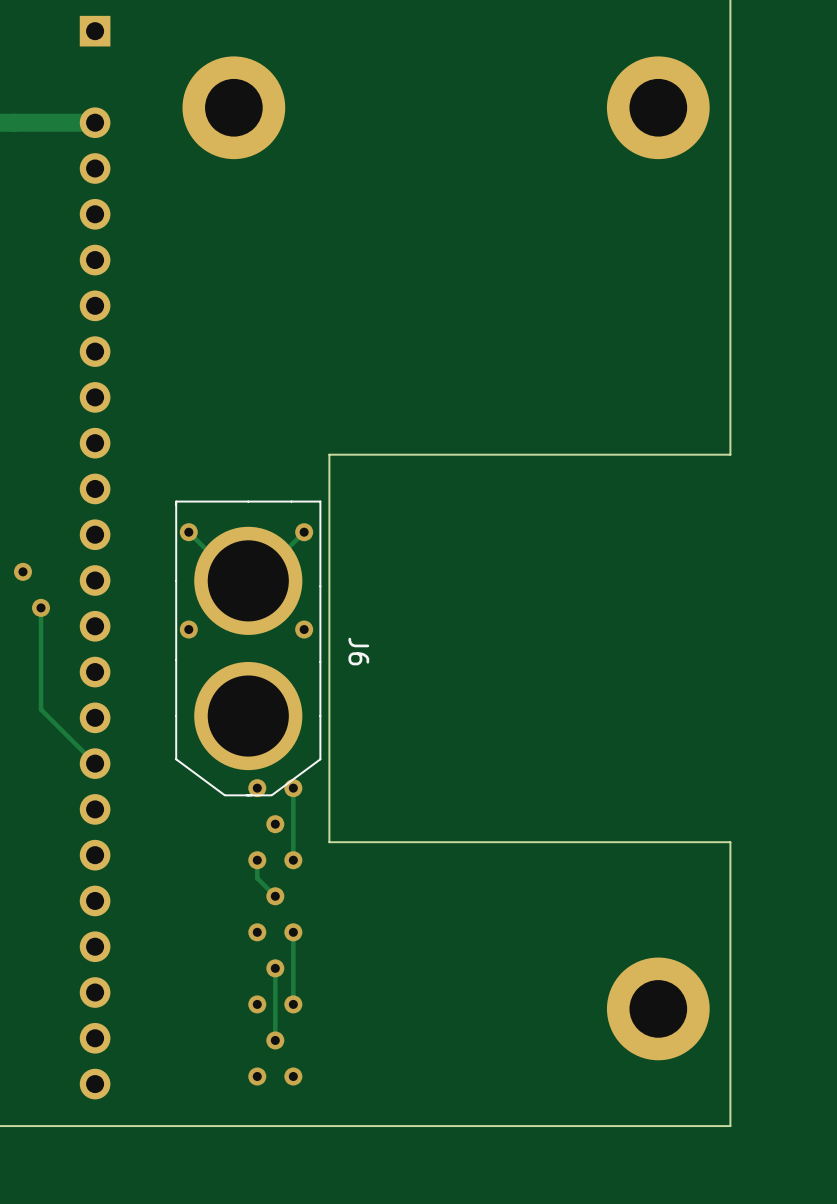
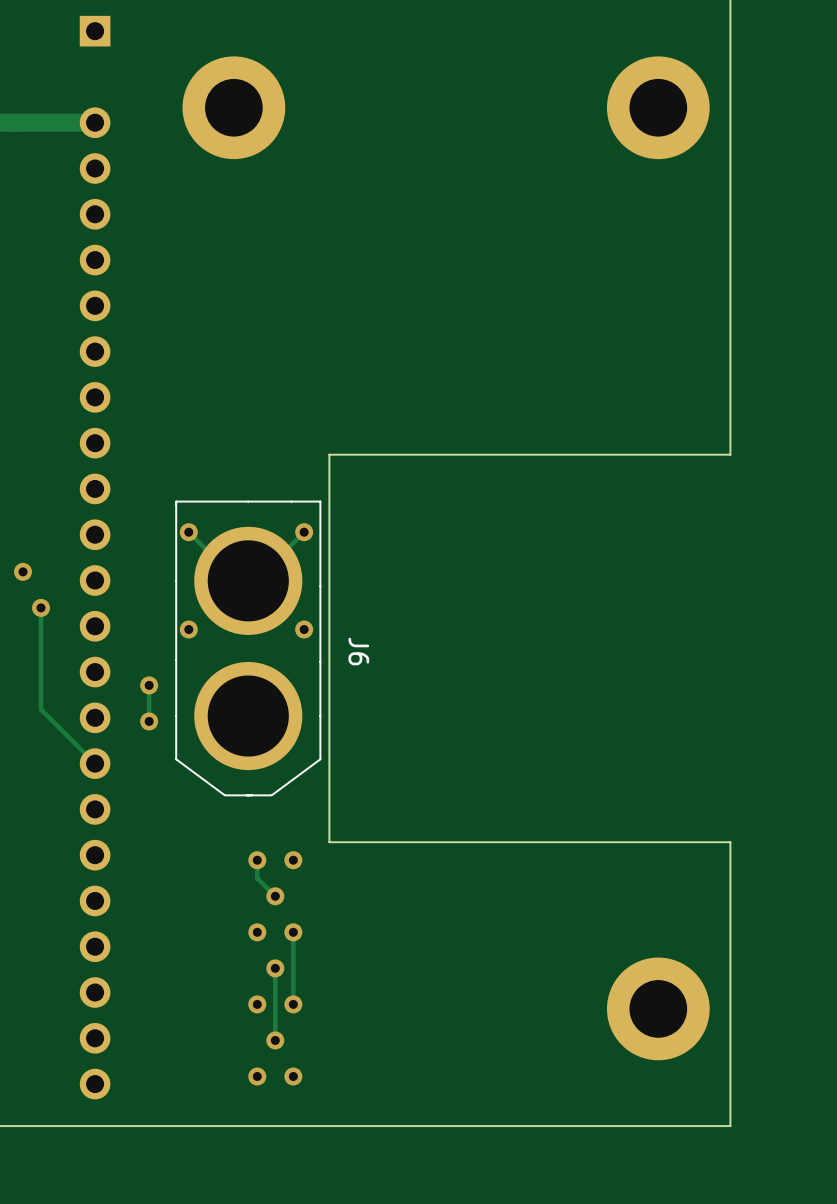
track: none -> (149, 685) (149, 721)
via: none -> (149, 685)
via: none -> (149, 721)
via: (257, 788) -> none
track: (293, 788) (293, 860) -> none
via: (293, 788) -> none
via: (275, 824) -> none

